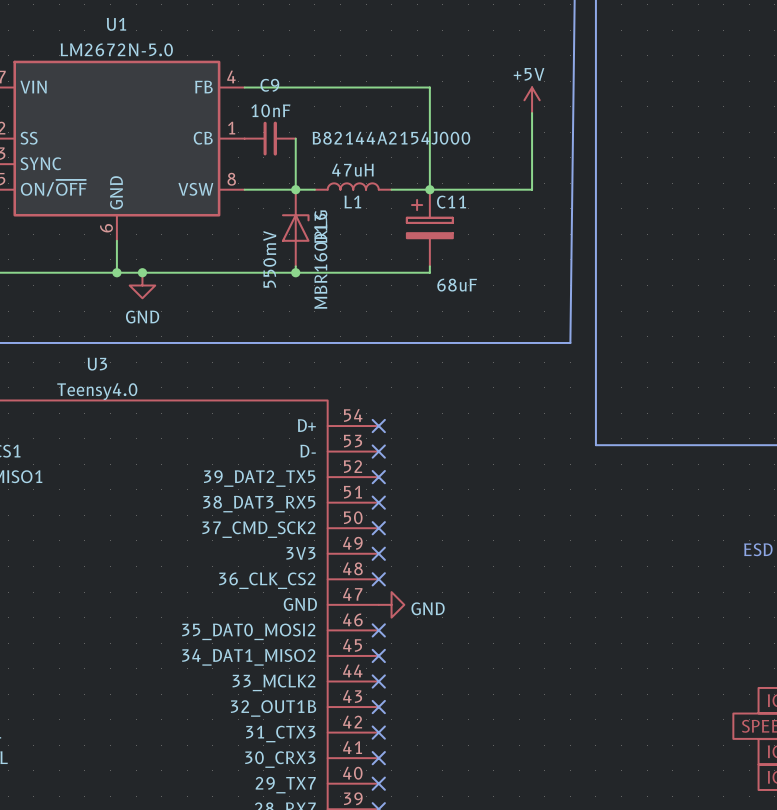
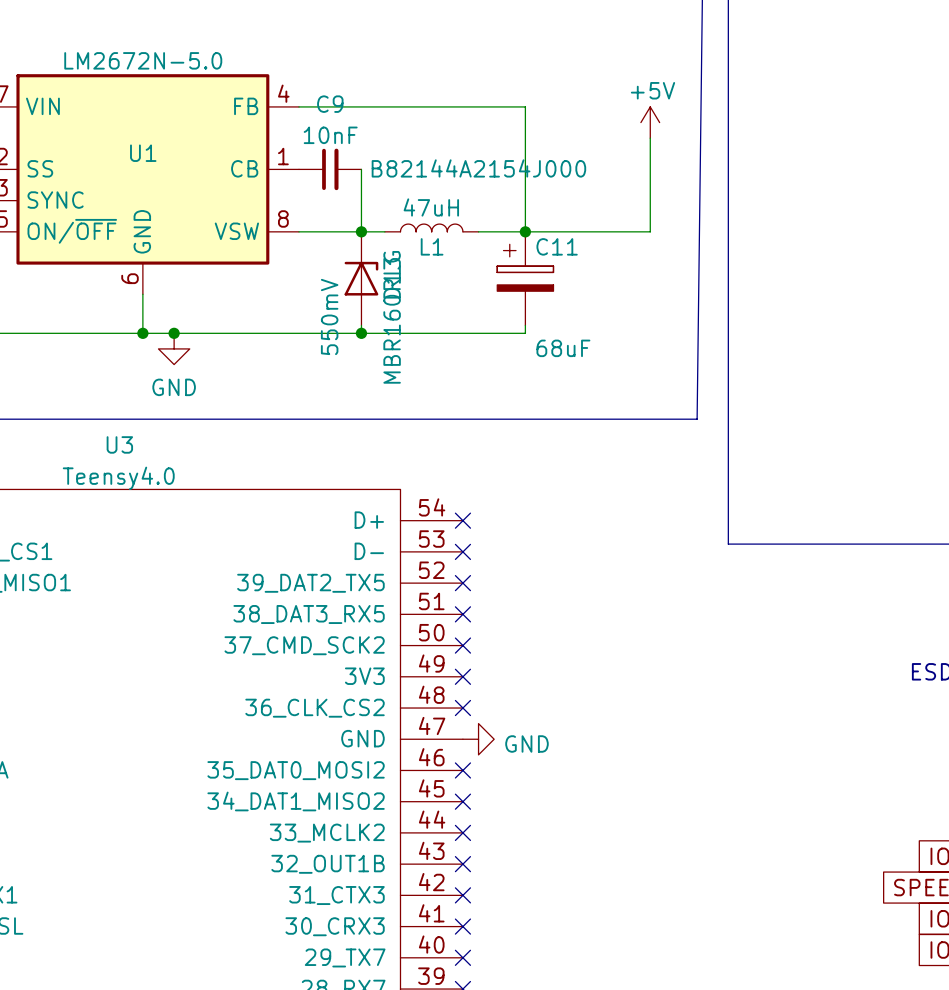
U1 name position: U1 (116, 24) -> U1 (143, 153)

